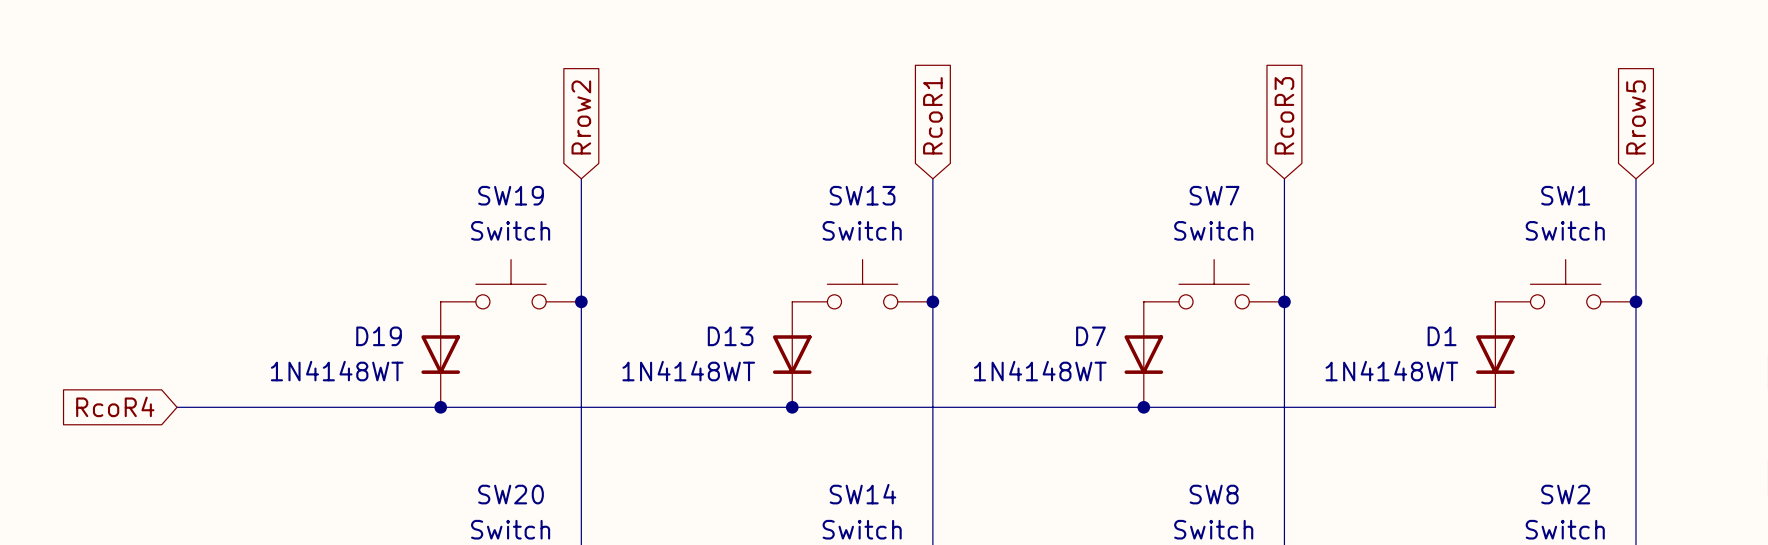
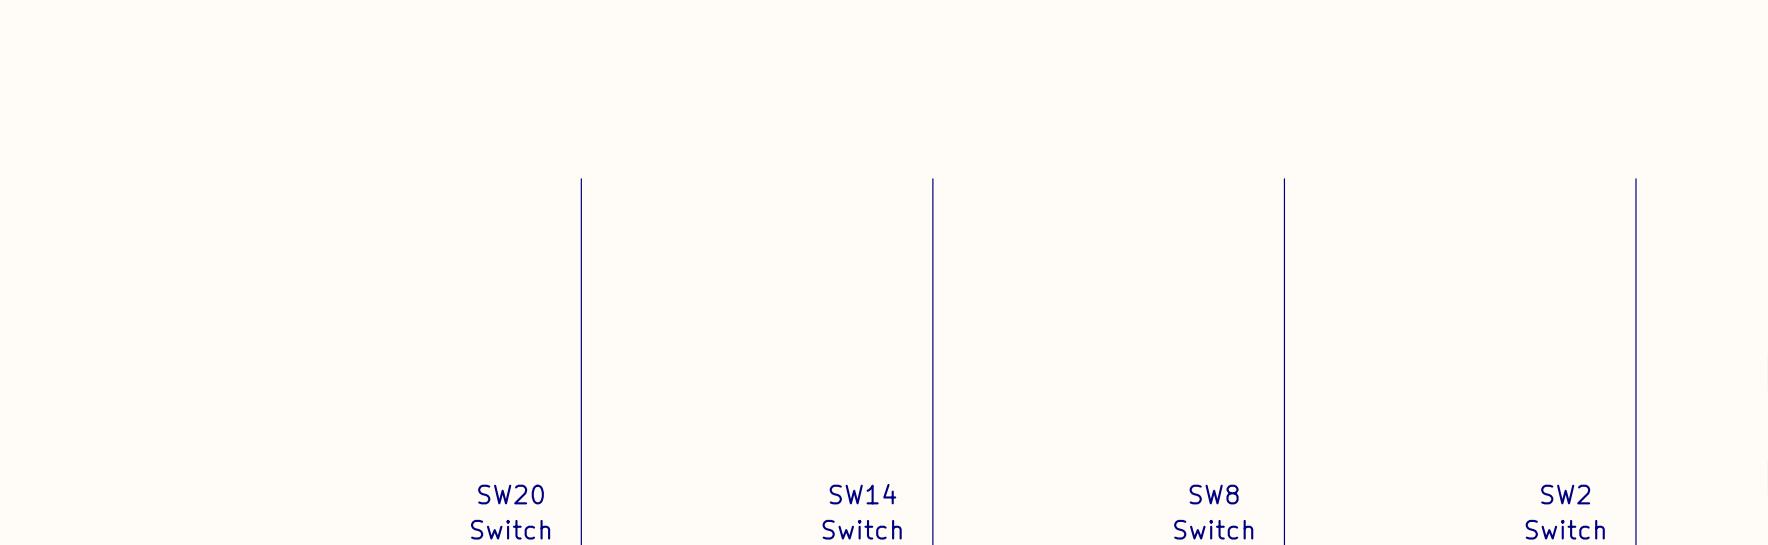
global label: RcoR1 (932, 115) -> none
global label: RcoR3 (1284, 115) -> none
global label: Rrow2 (581, 117) -> none
global label: Rrow5 (1635, 117) -> none
SW19: Switch (511, 284) -> none
SW13: Switch (862, 284) -> none
SW7: Switch (1214, 284) -> none
SW1: Switch (1565, 284) -> none
junction: (581, 301) -> none
junction: (932, 301) -> none
junction: (1284, 301) -> none
junction: (1635, 301) -> none
D19: 1N4148WT (440, 354) -> none
D13: 1N4148WT (792, 354) -> none
D7: 1N4148WT (1143, 354) -> none
D1: 1N4148WT (1495, 354) -> none
global label: RcoR4 (115, 406) -> none
wire: (177, 407) (1495, 407) -> none
junction: (440, 407) -> none
junction: (792, 407) -> none
junction: (1143, 407) -> none

